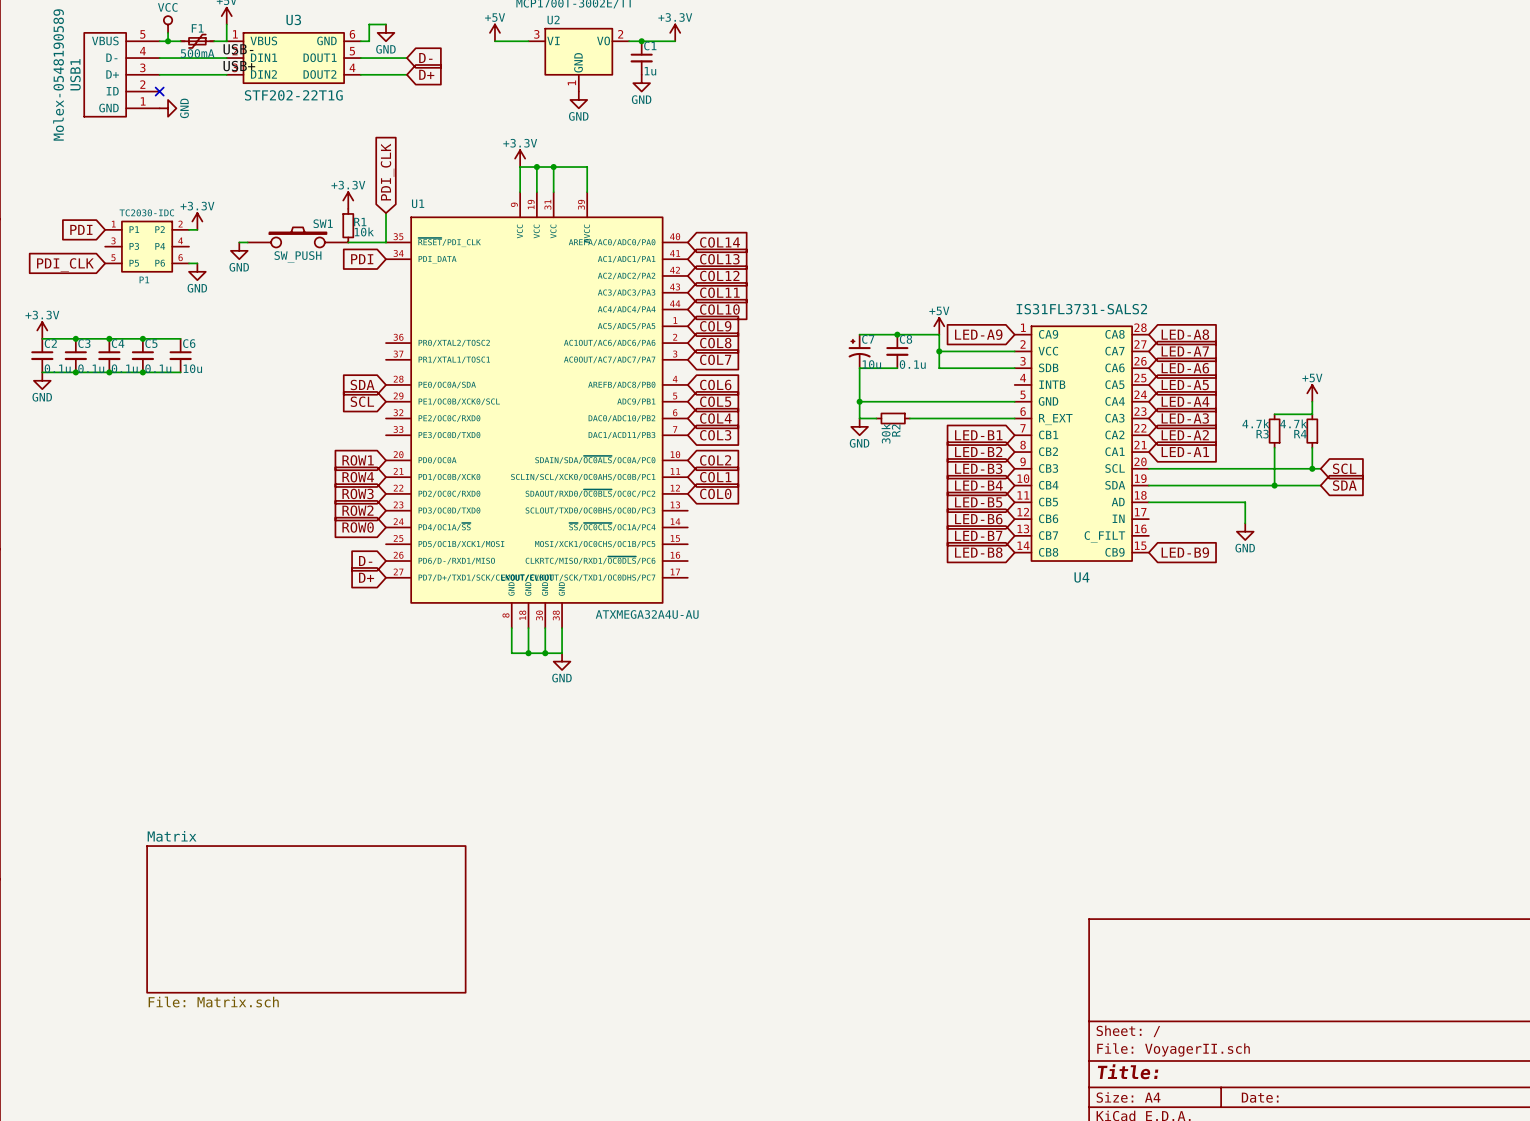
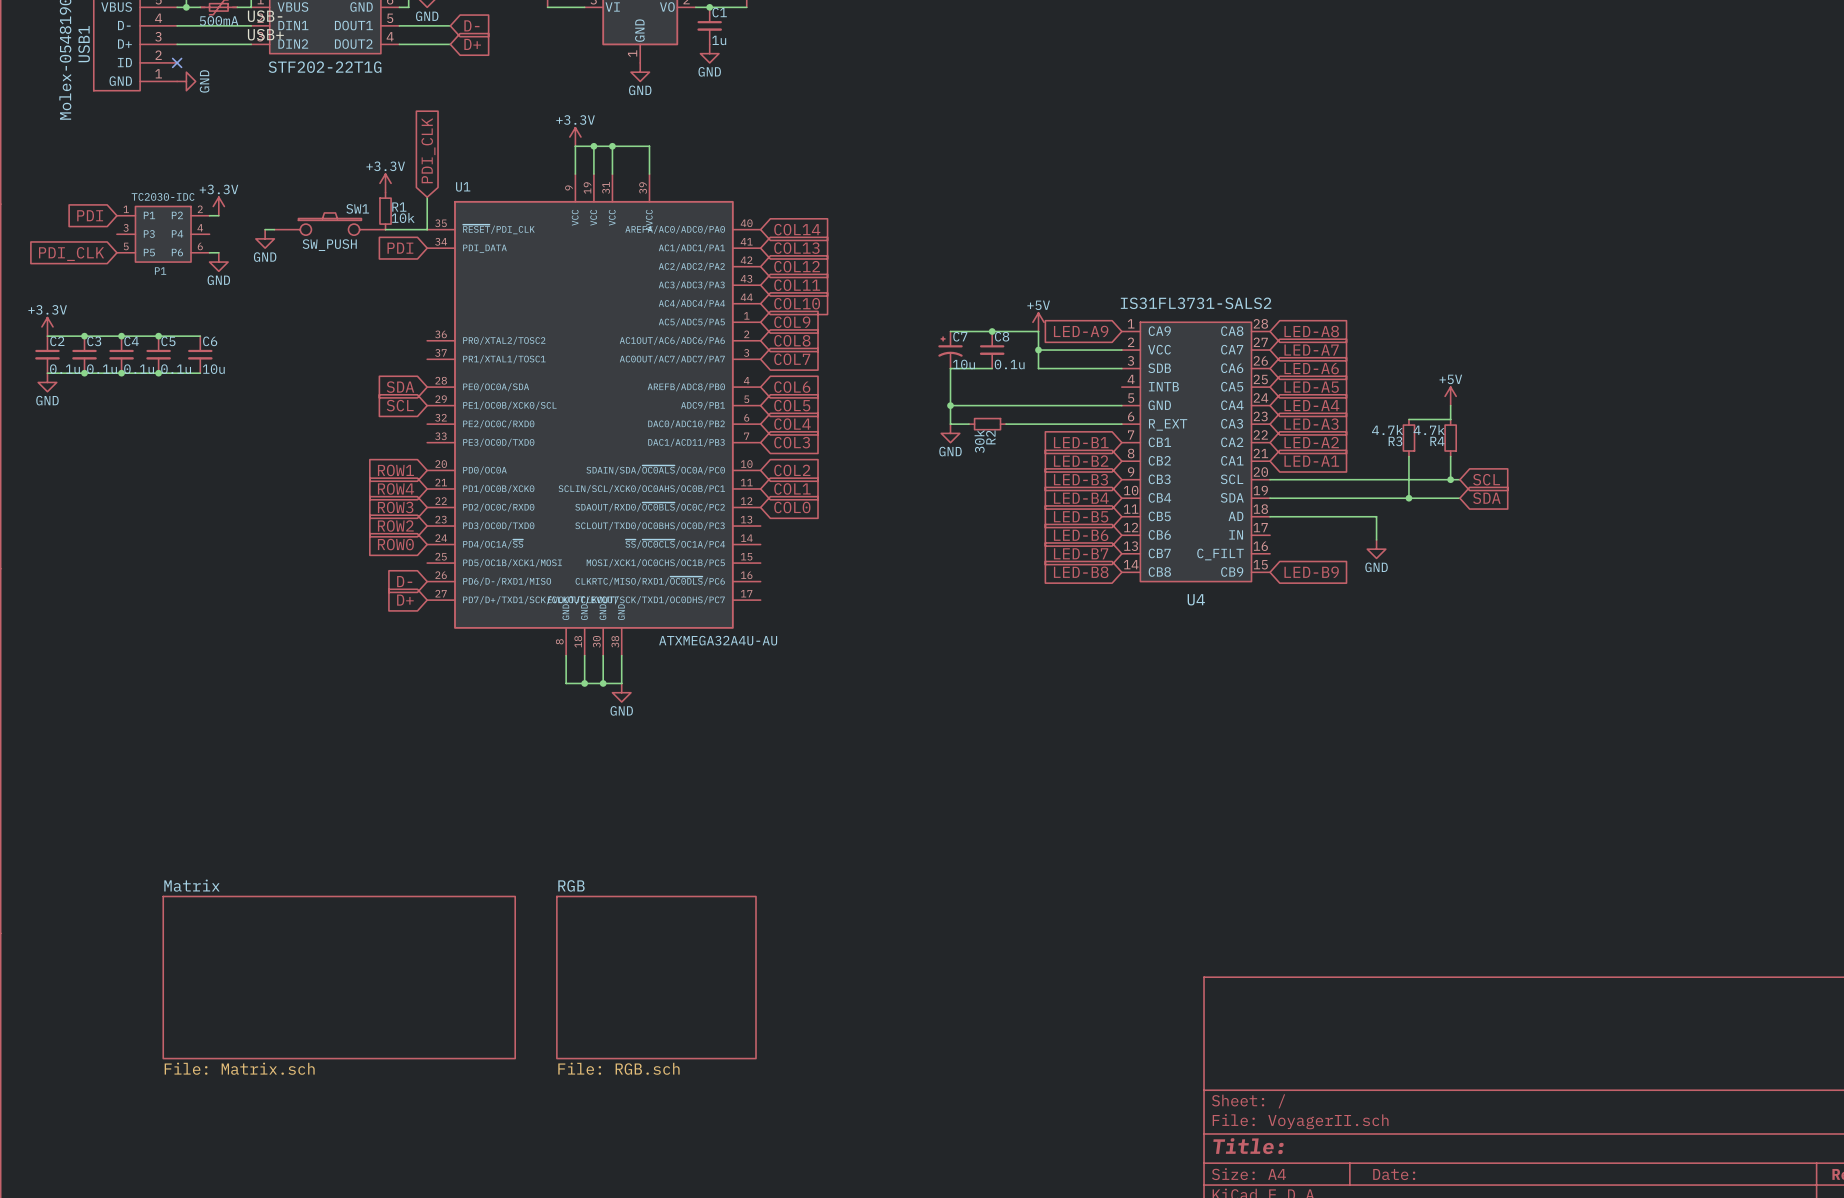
sheet RGB: none -> File: RGB.sch (656, 977)

